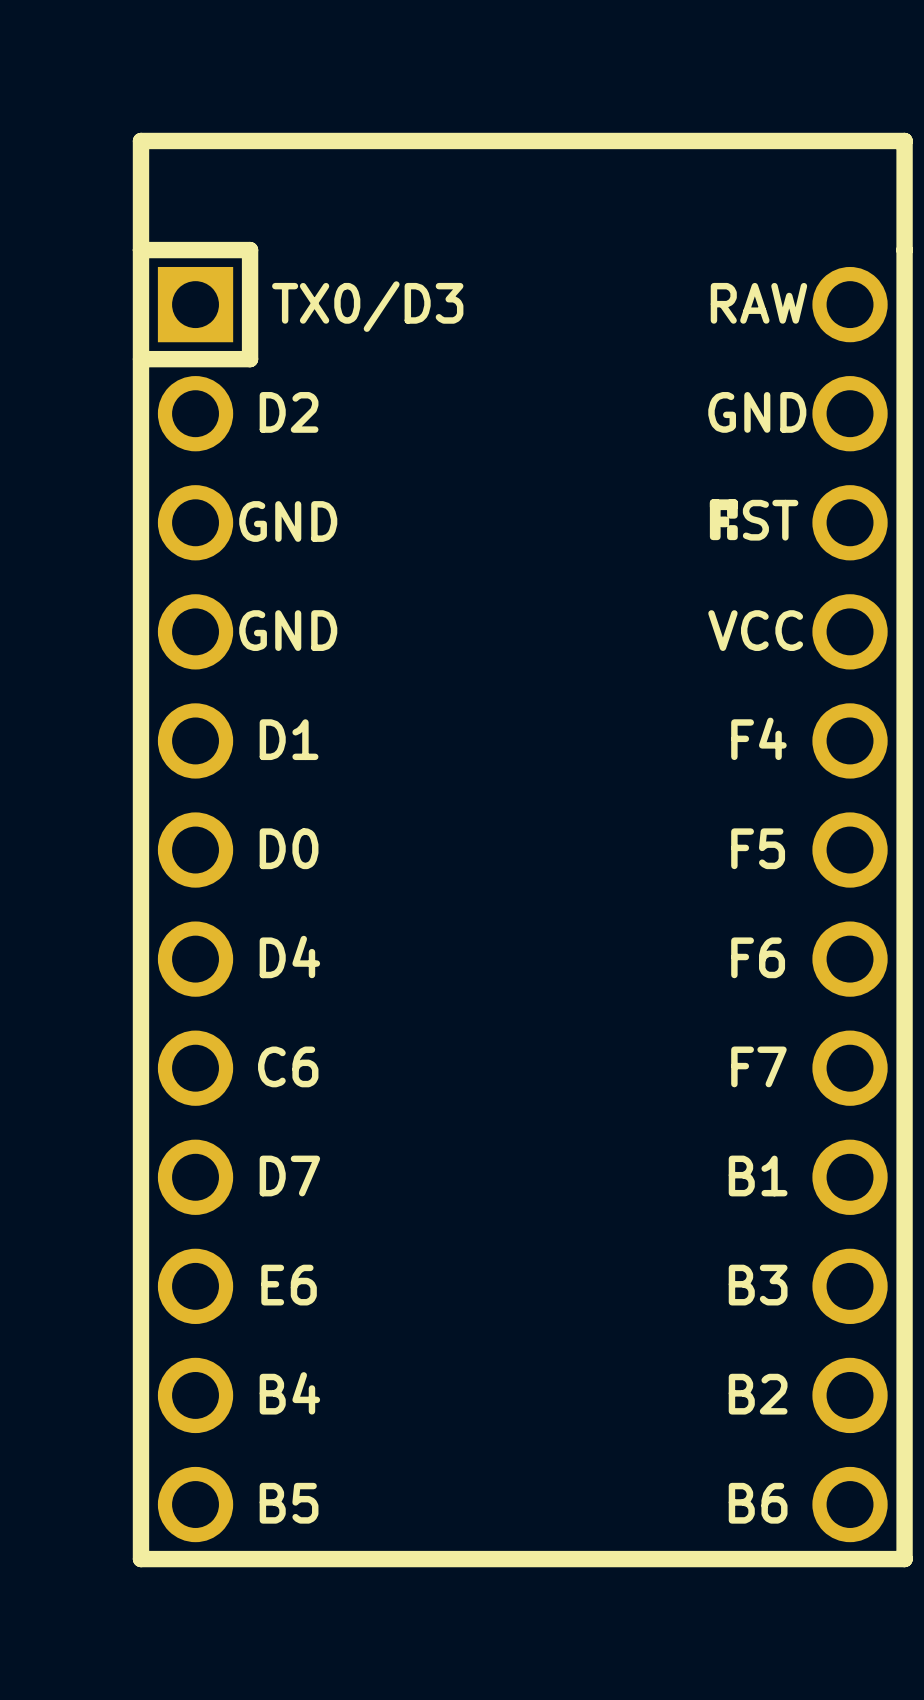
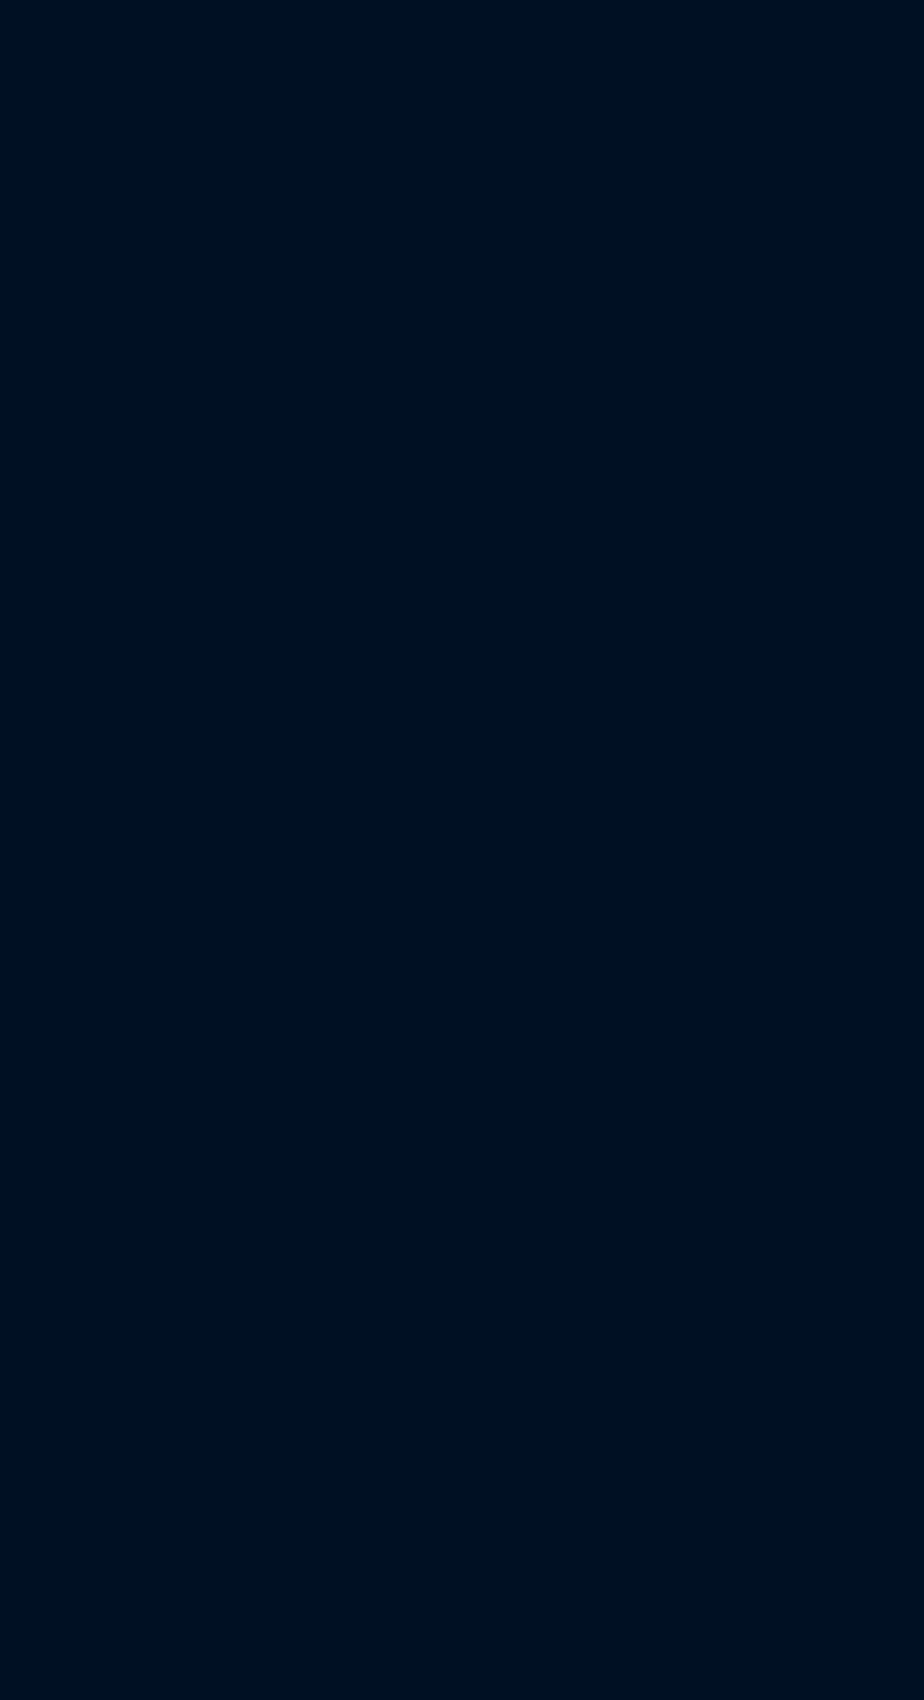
part: (522, 850) -> none

